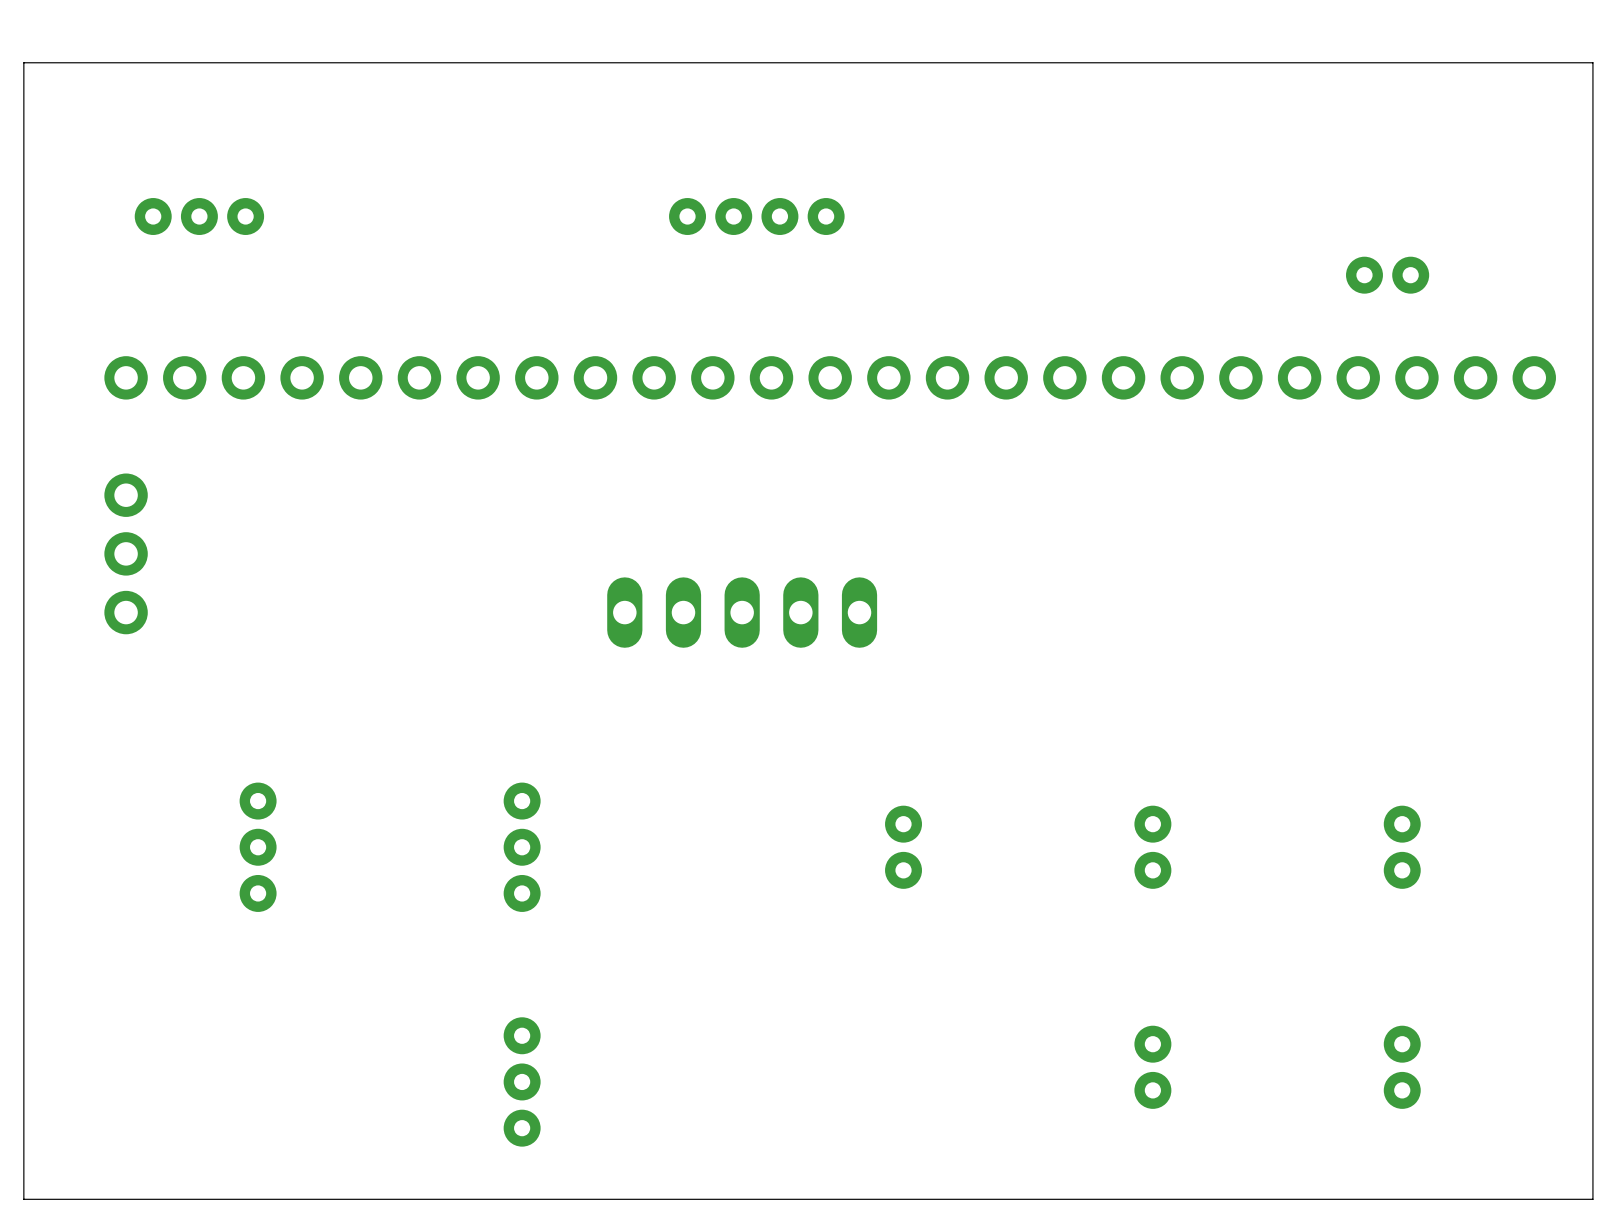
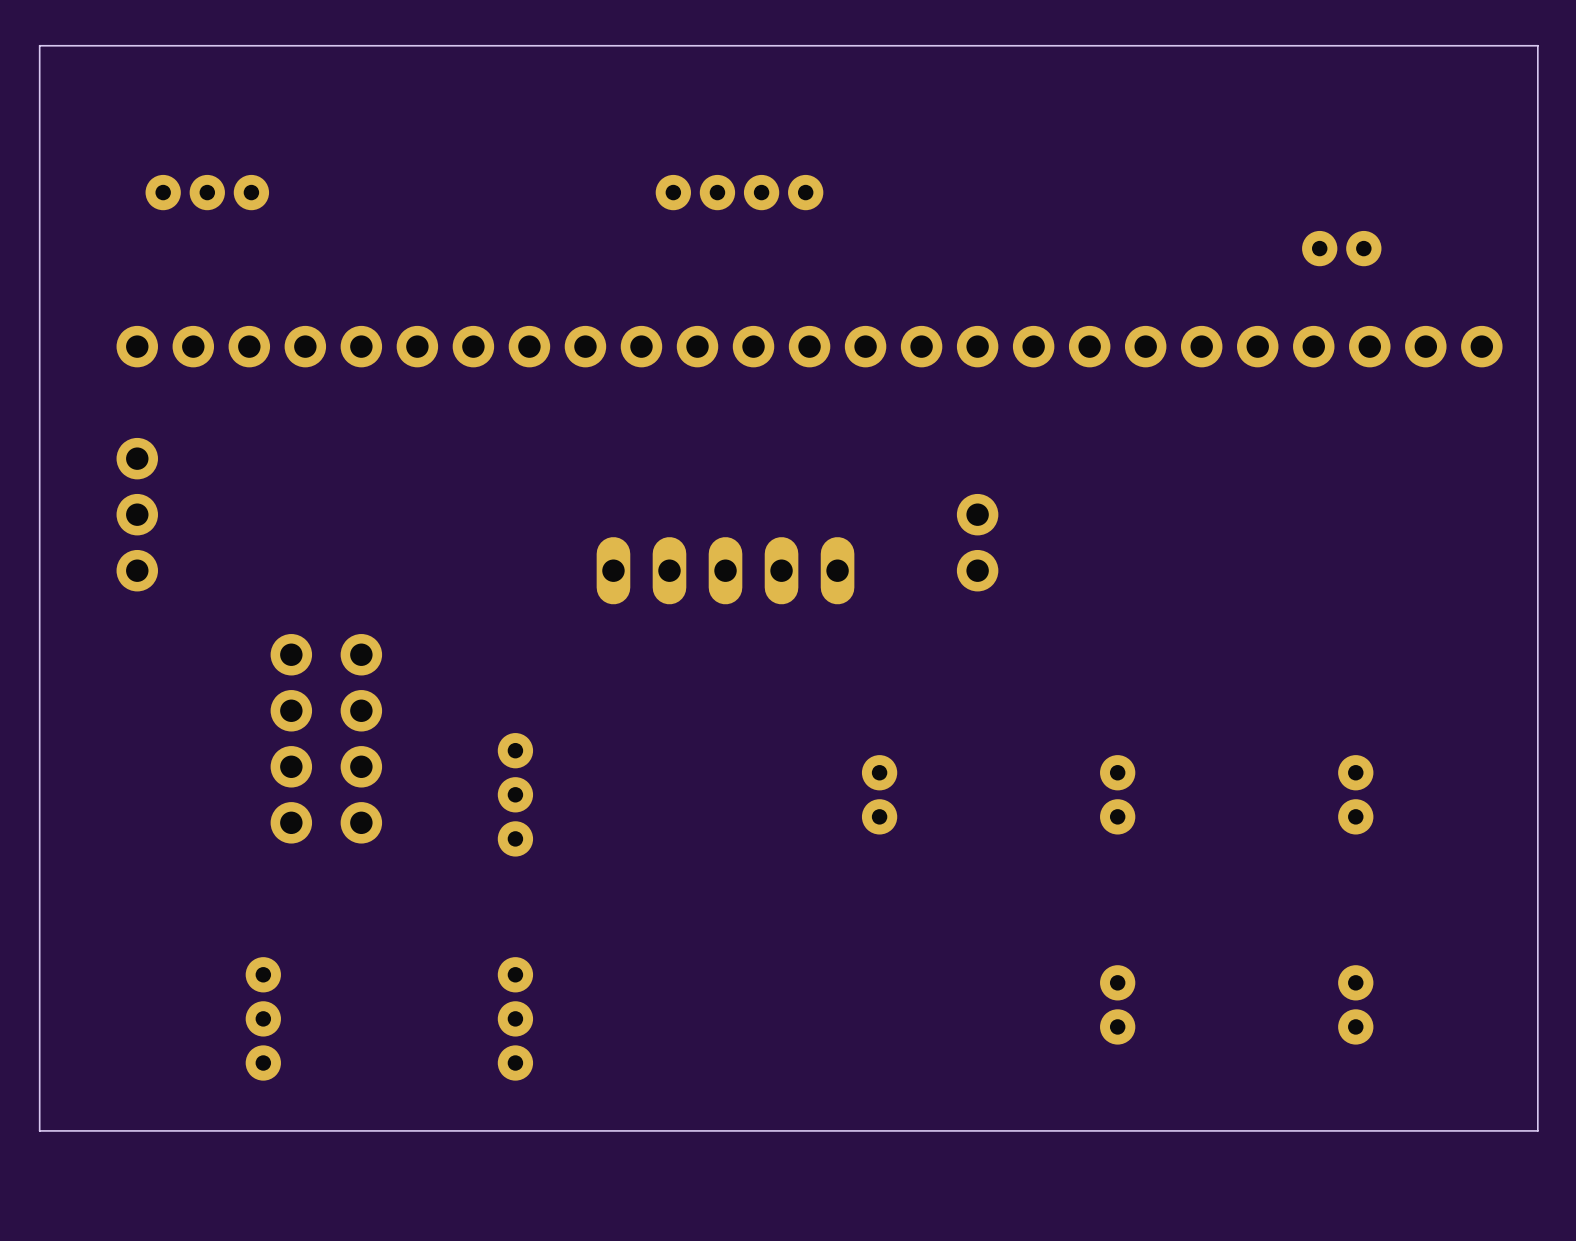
part: none -> (977, 542)
part: none -> (291, 682)
part: none -> (361, 682)
part position: (258, 847) -> (263, 1018)
part: none -> (291, 794)
part: none -> (361, 794)

